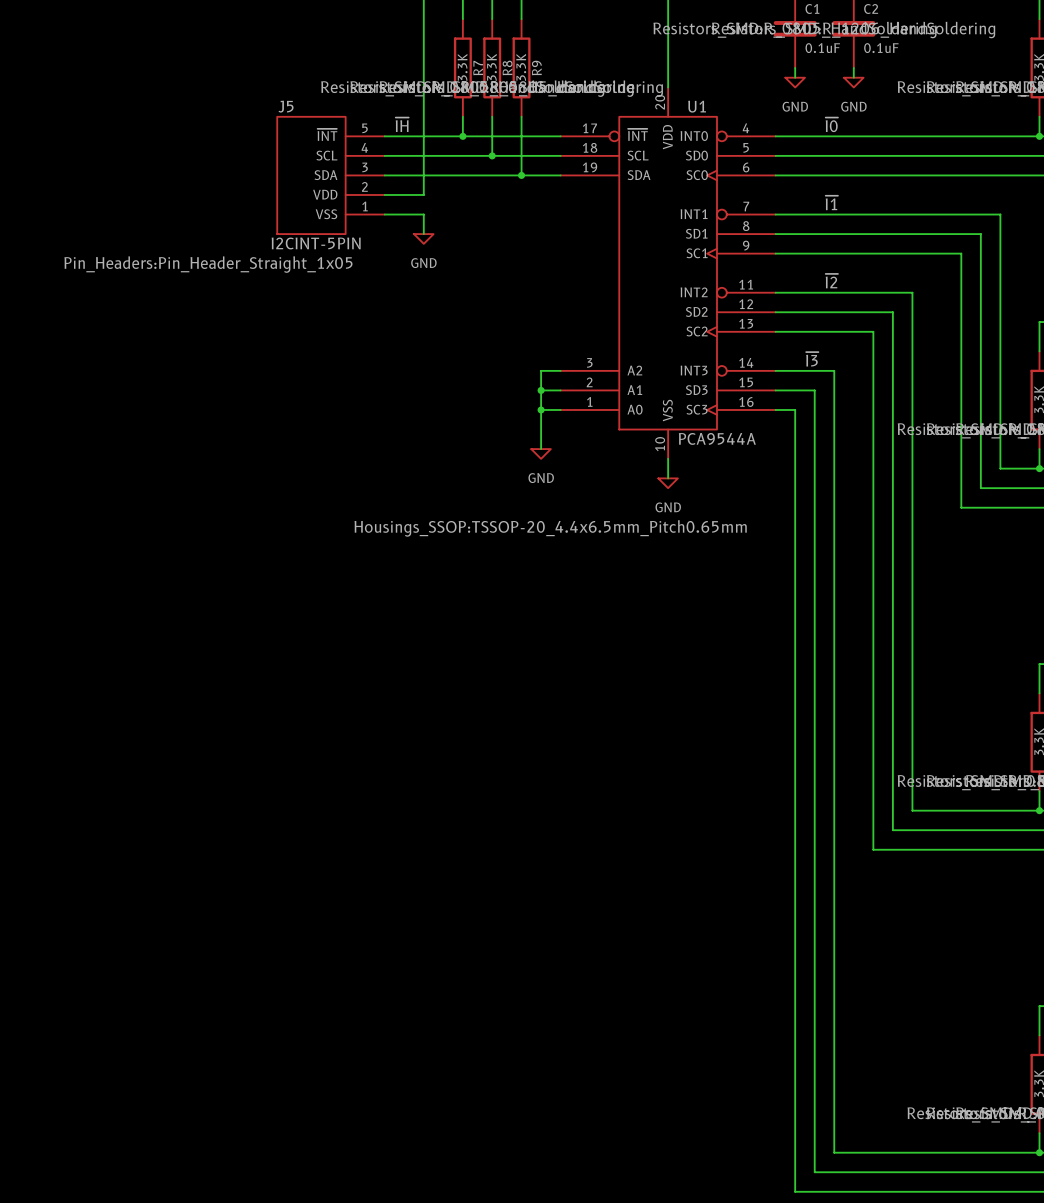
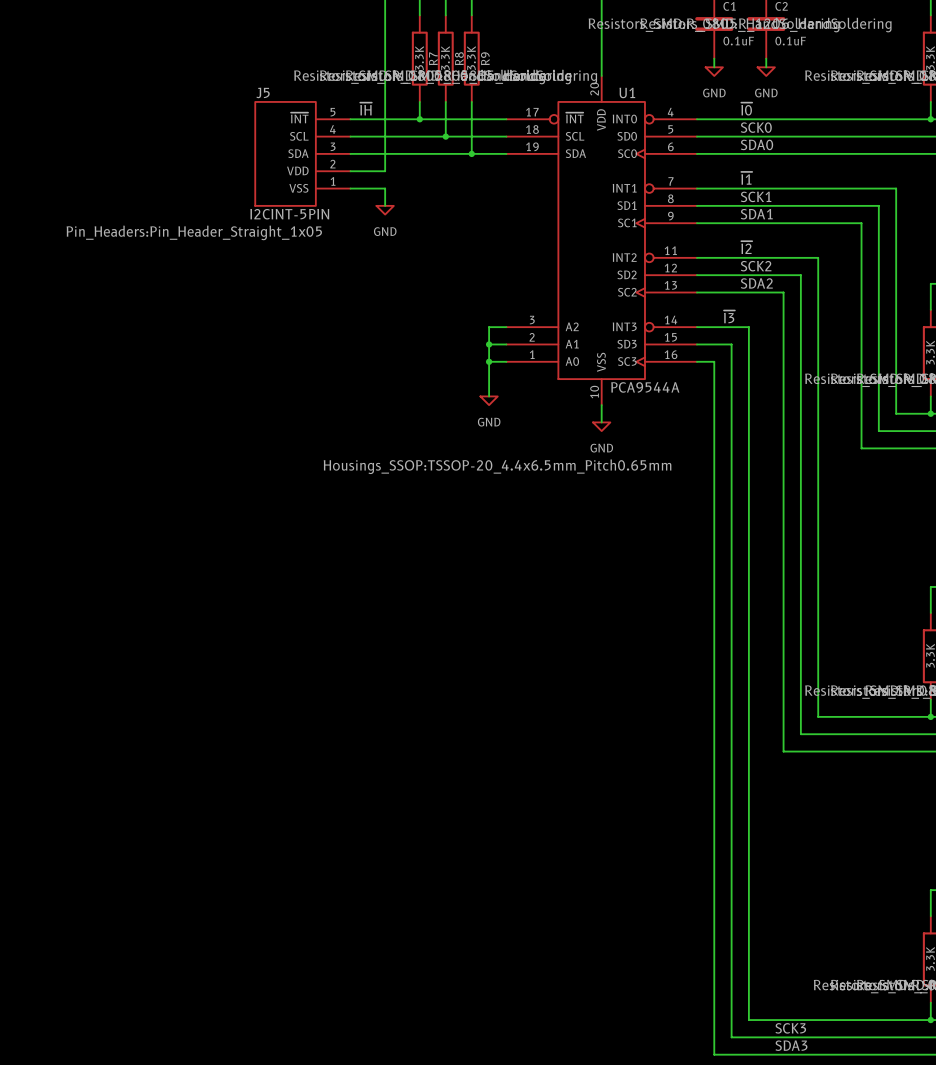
label: none -> SCK0 (756, 127)
label: none -> SDA0 (756, 144)
label: none -> SCK1 (756, 196)
label: none -> SDA1 (756, 214)
label: none -> SCK2 (756, 266)
label: none -> SDA2 (756, 283)
label: none -> SCK3 (790, 1028)
label: none -> SDA3 (791, 1045)

